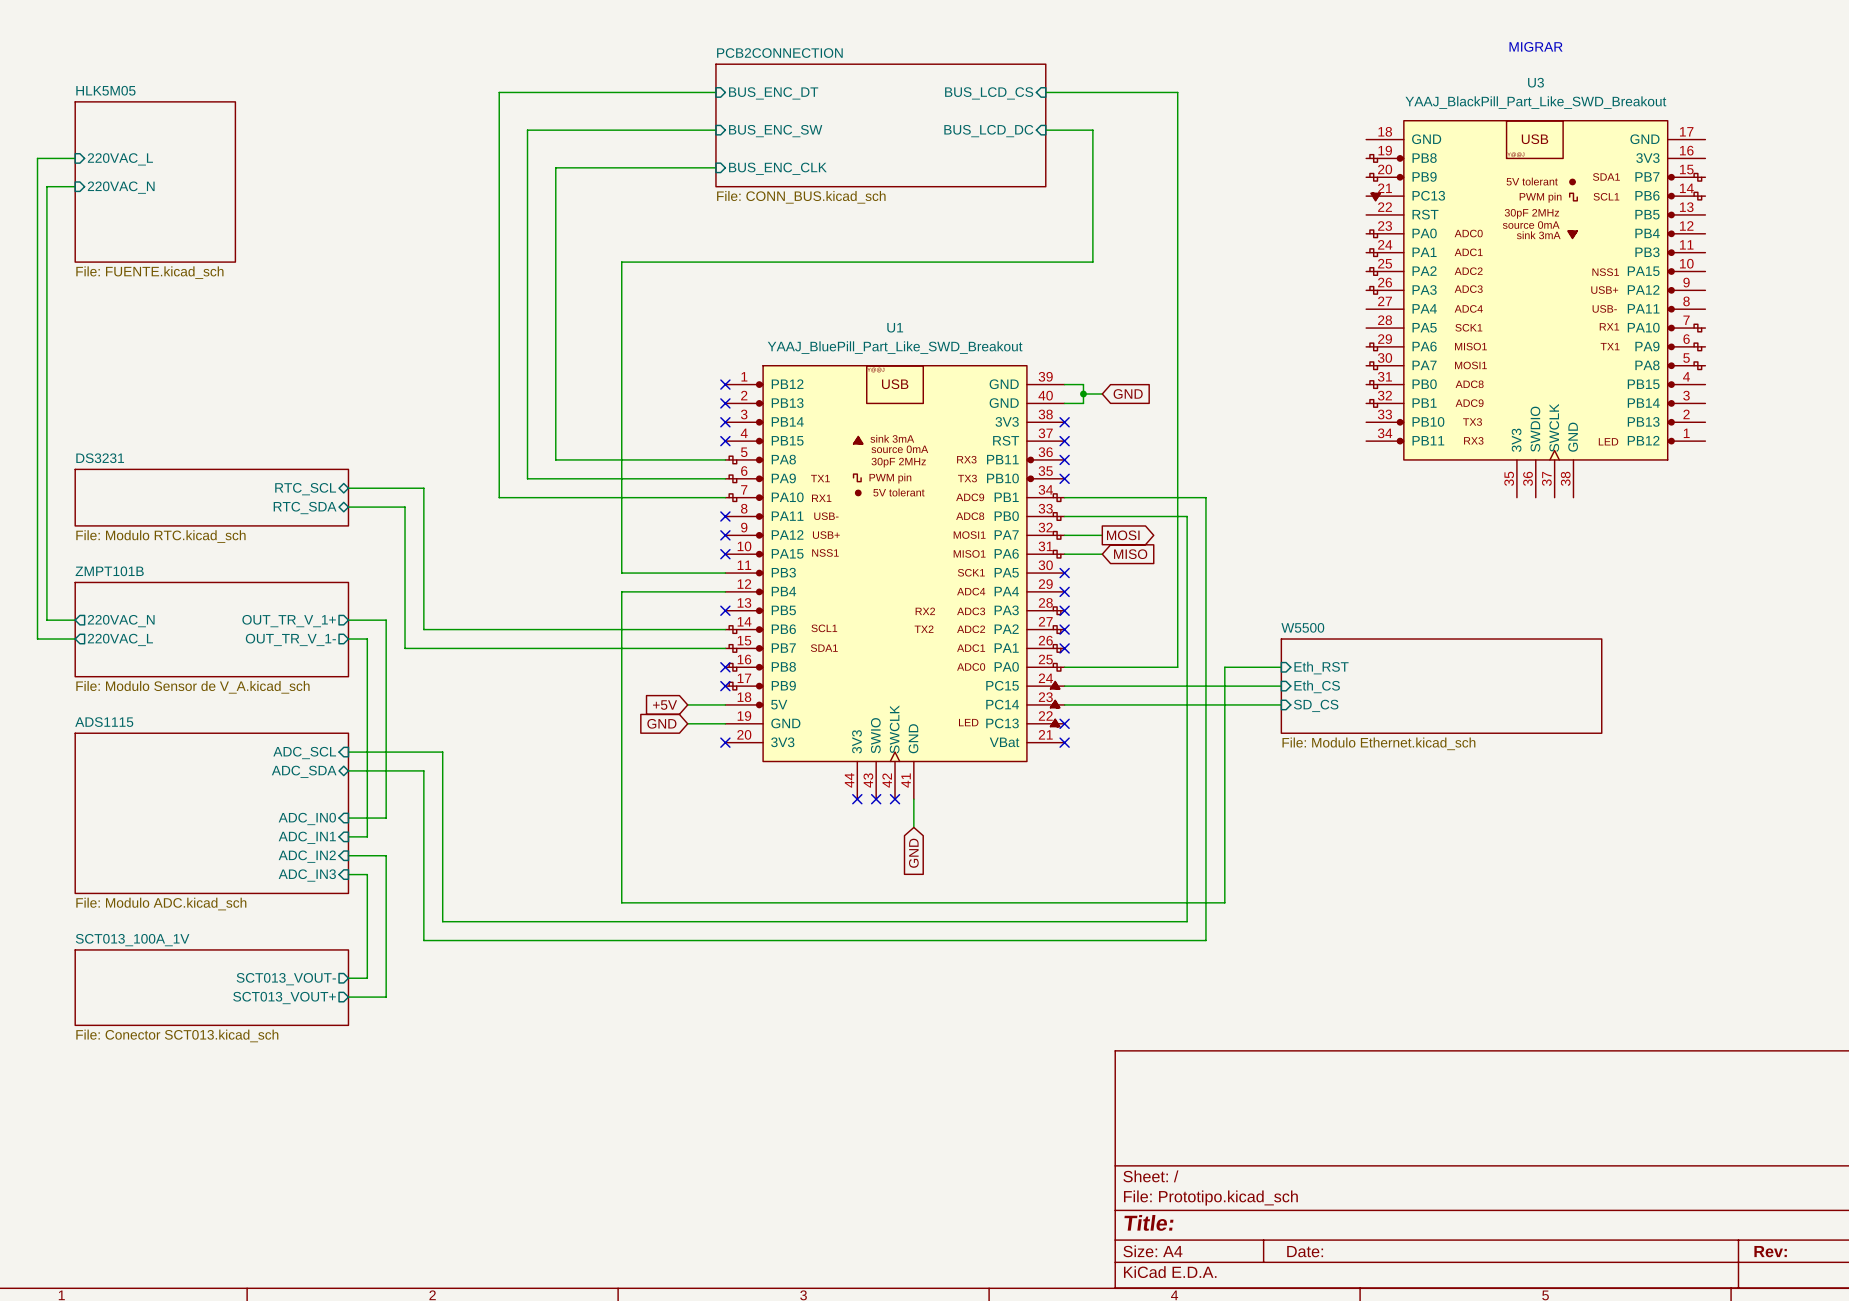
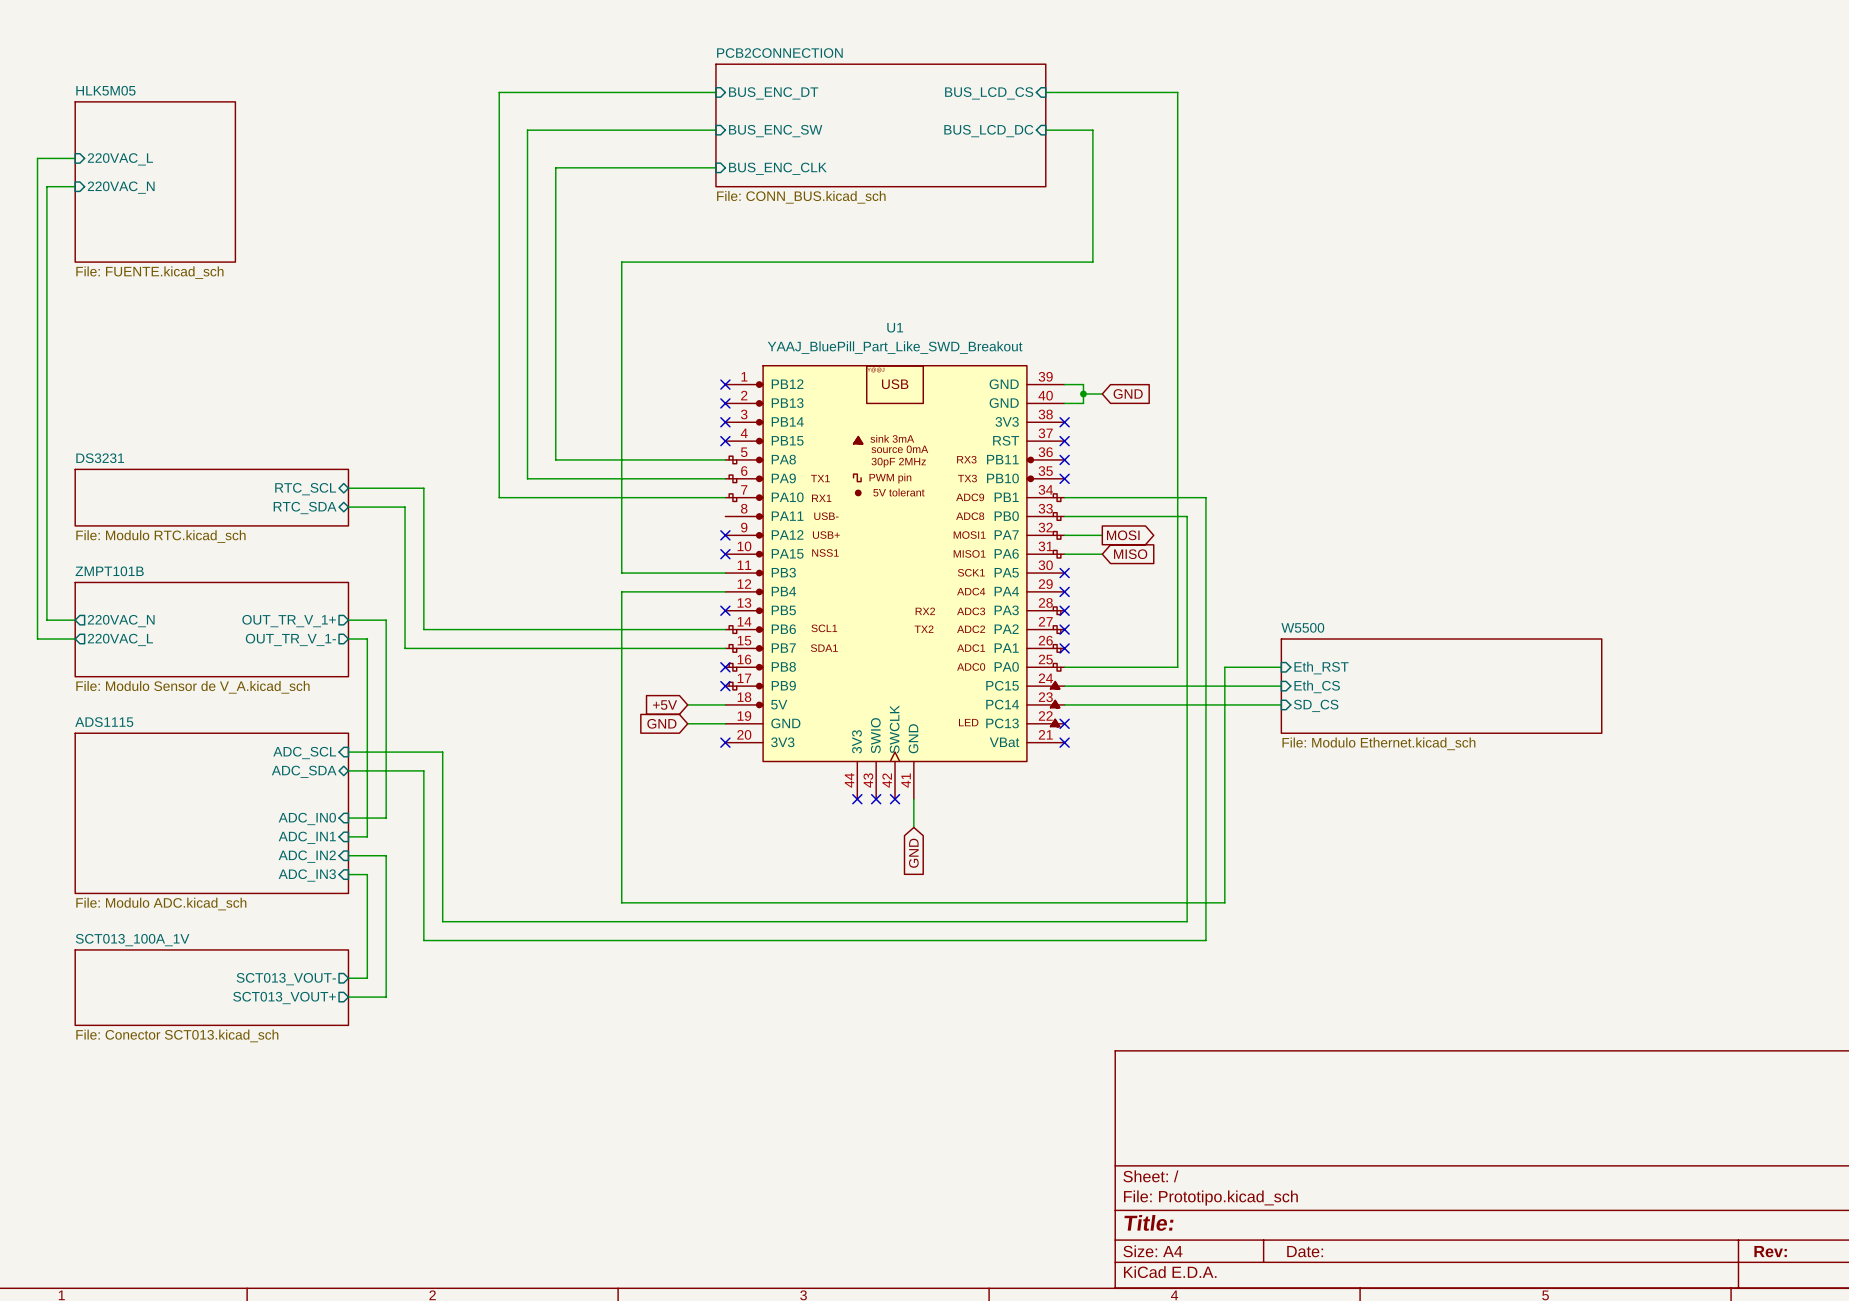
text: MIGRAR (1536, 46) -> none
U3: YAAJ_BlackPill_Part_Like_SWD_Breakout (1535, 309) -> none
no-connect mark: (725, 516) -> none

